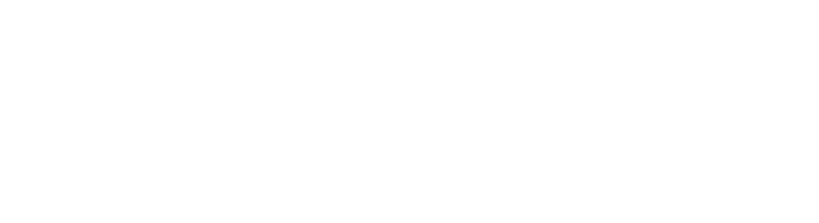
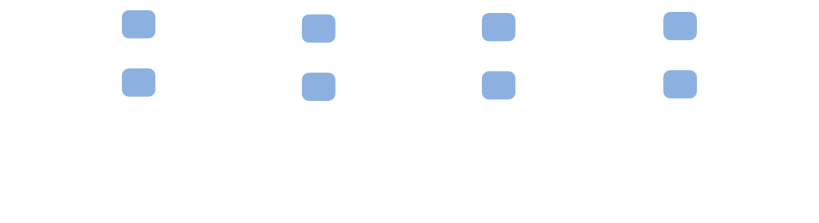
part: none -> (138, 53)
part: none -> (680, 55)
part: none -> (498, 56)
part: none -> (318, 57)

